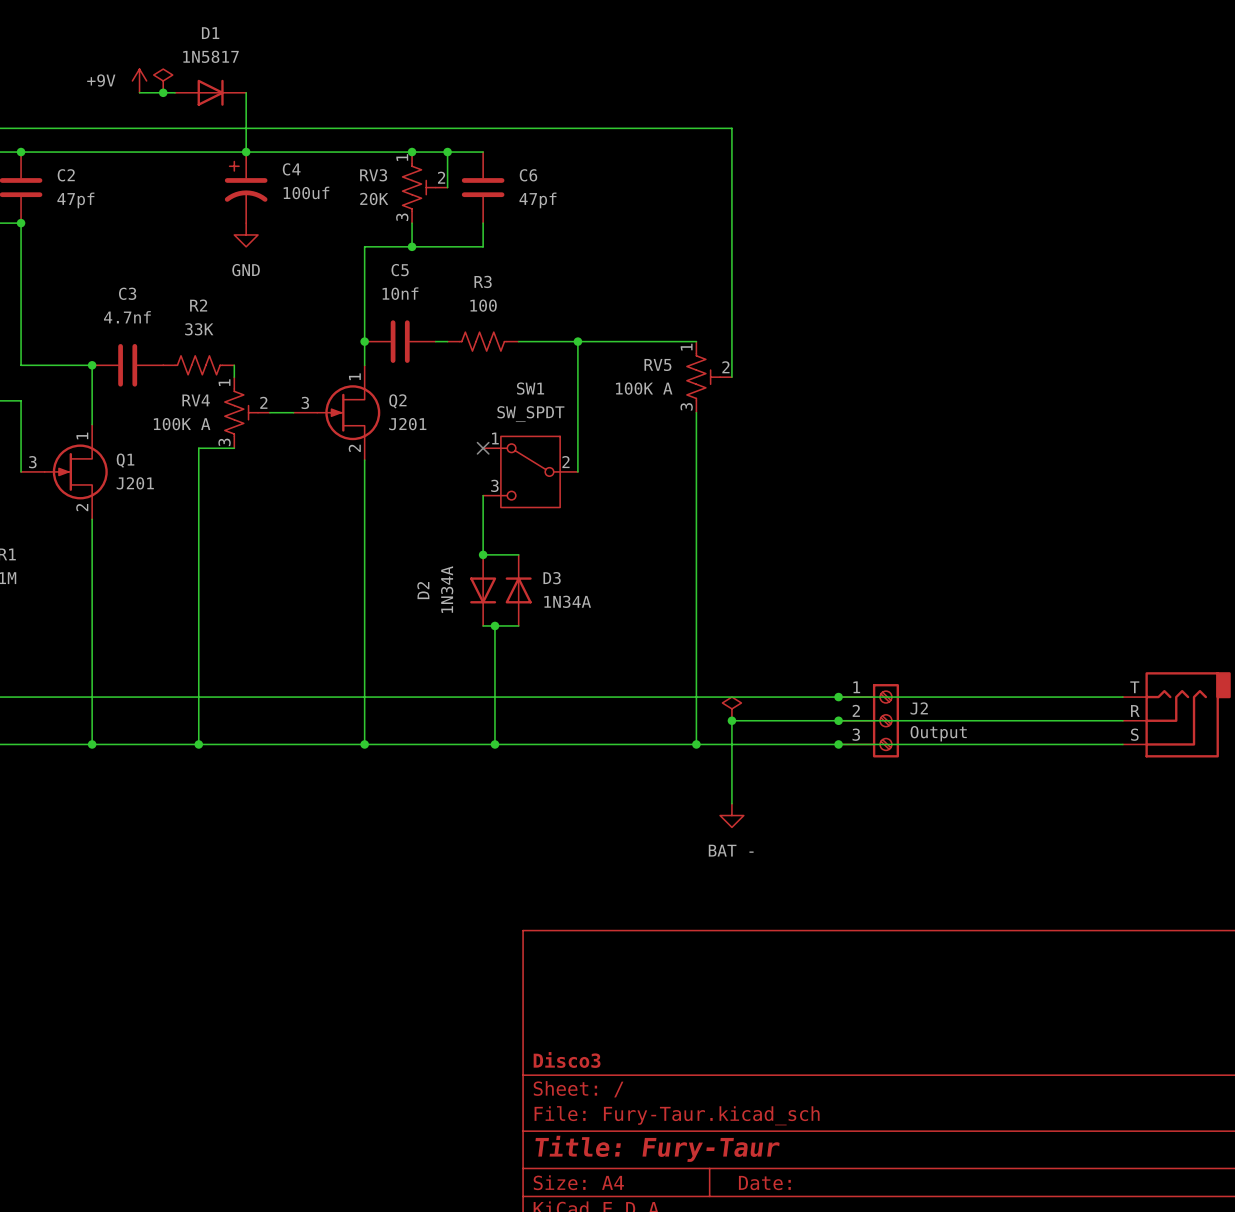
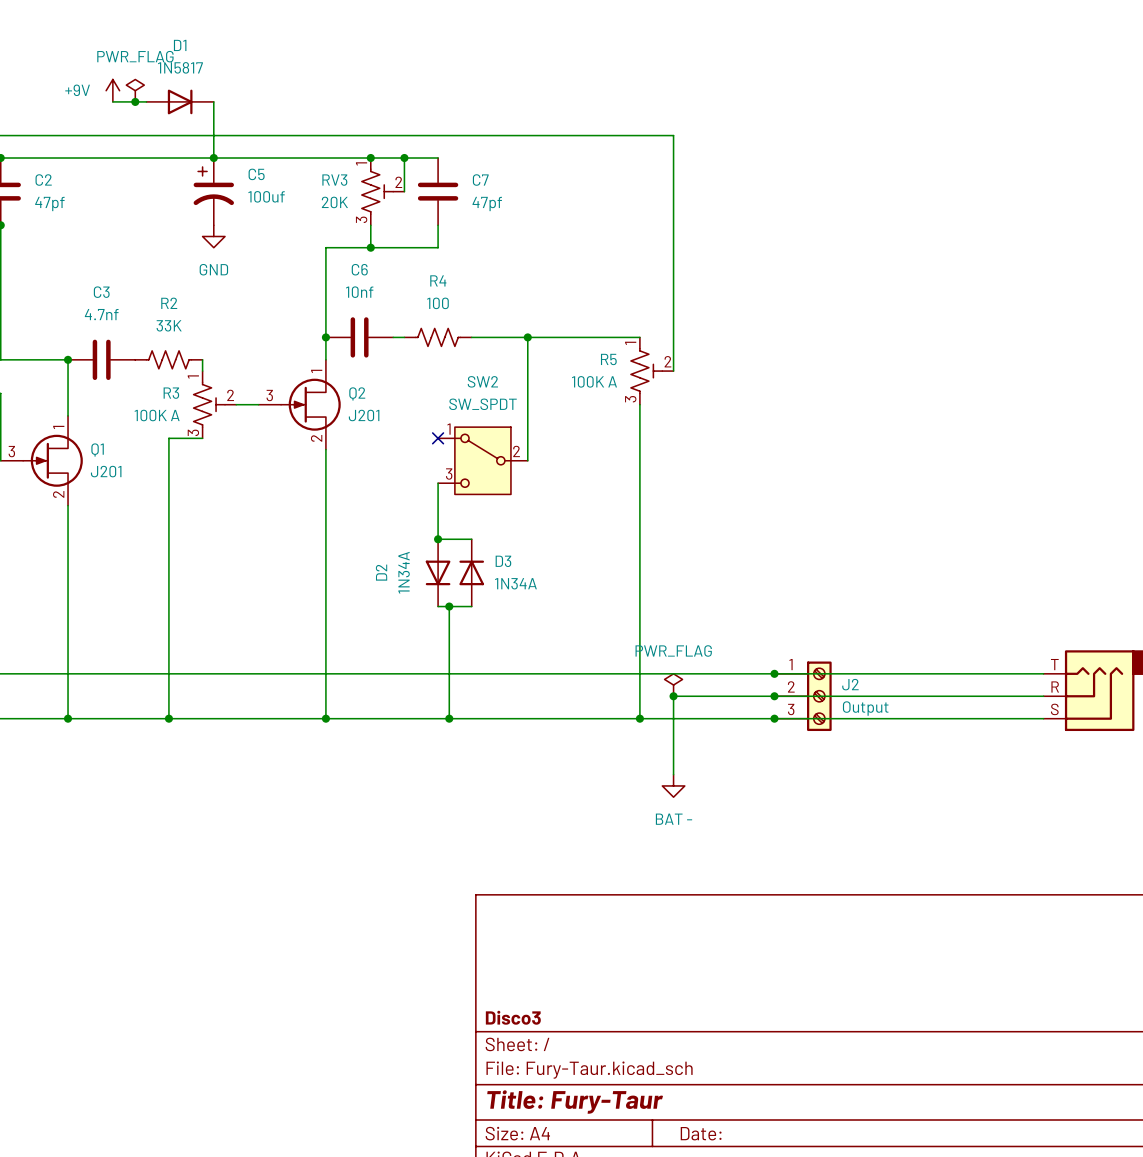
power symbol text: none -> PWR_FLAG (135, 56)
C4 name: C4 (291, 169) -> C5 (256, 174)
C6 name: C6 (528, 175) -> C7 (480, 180)
C5 name: C5 (400, 270) -> C6 (359, 269)
R3 name: R3 (483, 281) -> R4 (438, 280)
RV5 name: RV5 (657, 364) -> R5 (608, 359)
SW1 name: SW1 (530, 388) -> SW2 (482, 381)
RV4 name: RV4 (196, 400) -> R3 (171, 393)
power symbol text: none -> PWR_FLAG (673, 650)

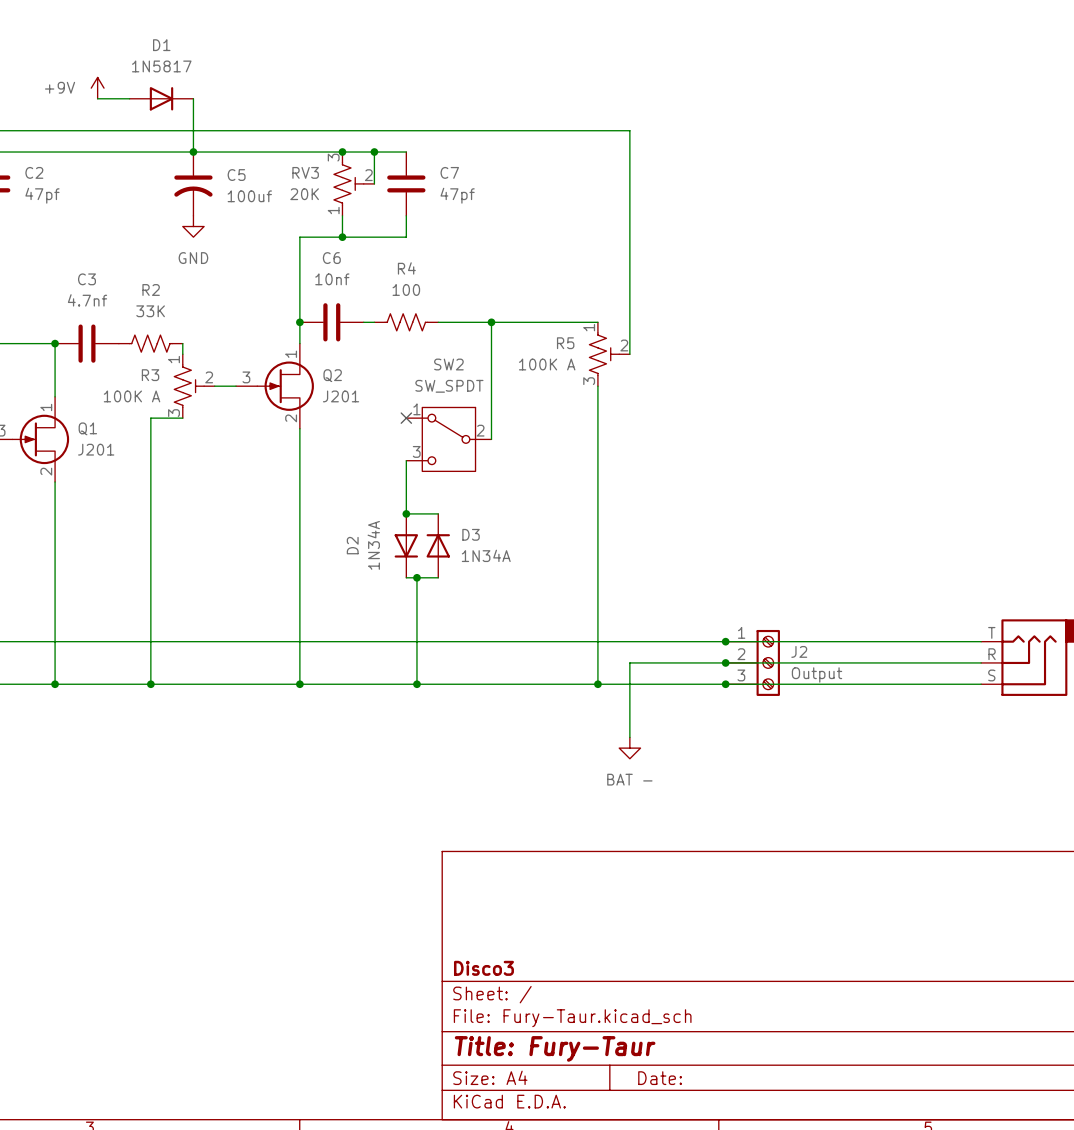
power symbol: PWR_FLAG (135, 90) -> none
junction: (135, 101) -> none
C5 symbol: [193, 158, 234, 226] -> [174, 152, 213, 216]
RV3 pin number: 1 (361, 163) -> 3 (333, 157)
RV3 pin number: 3 (361, 219) -> 1 (333, 210)
power symbol: PWR_FLAG (673, 685) -> none
junction: (673, 696) -> none

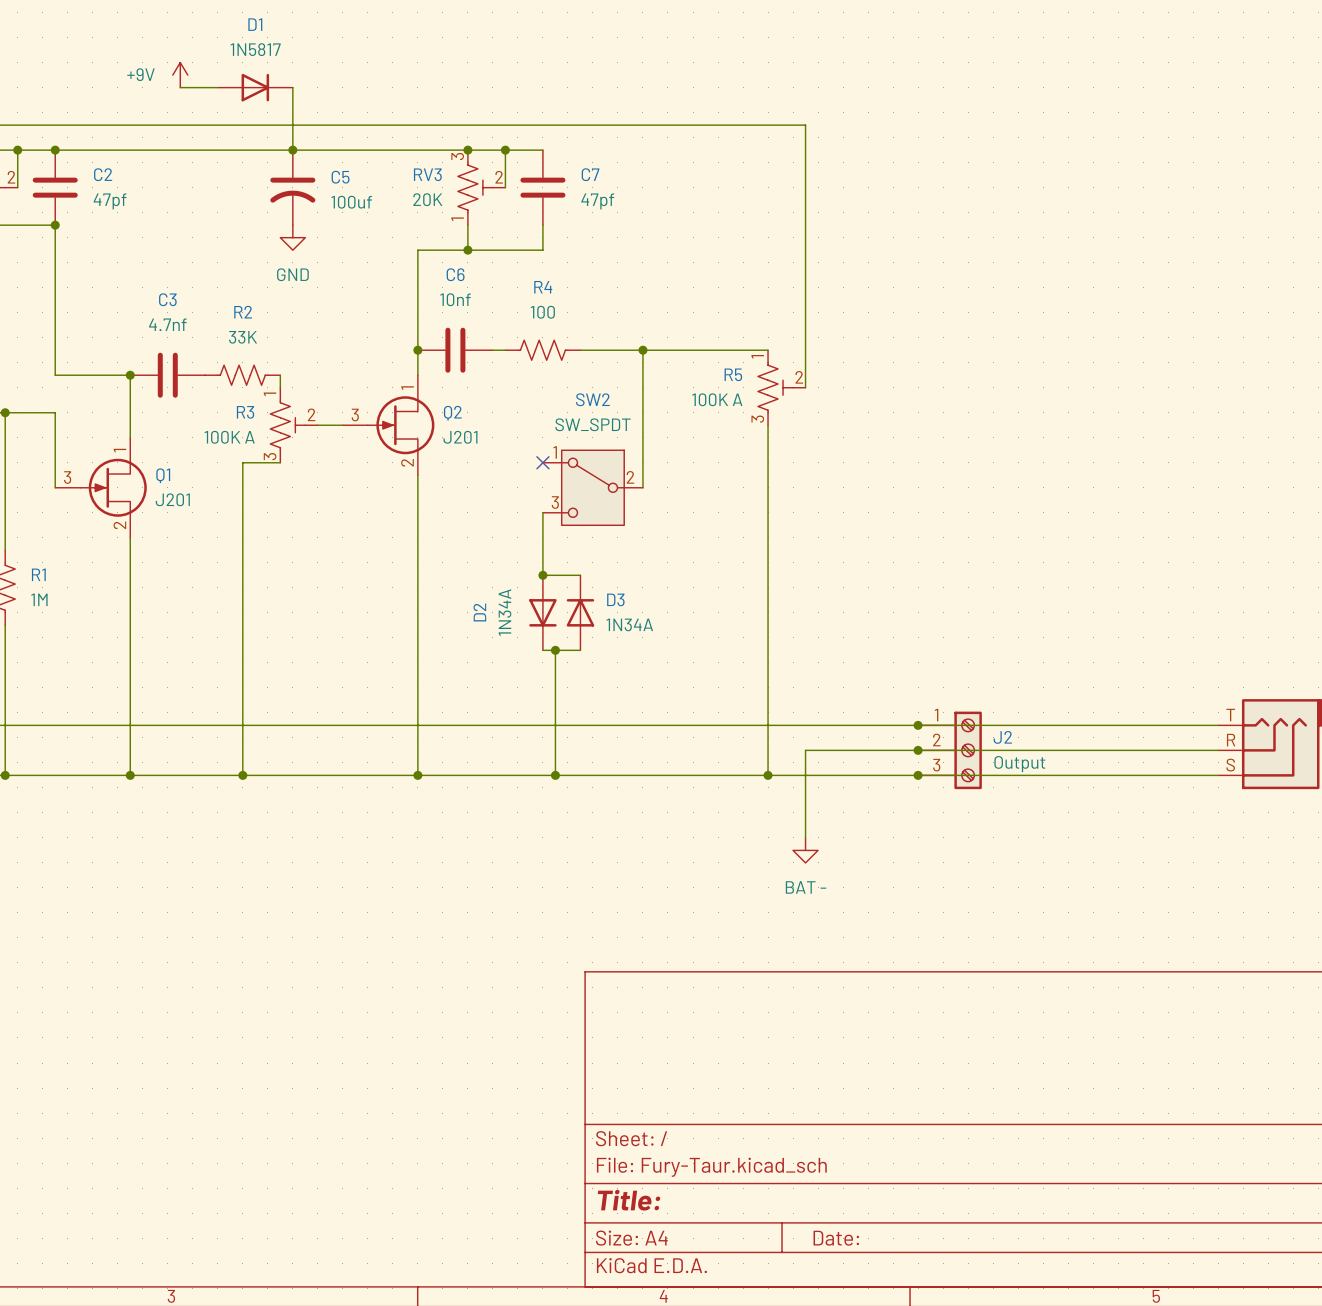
title block: Disco3 (483, 968) -> none
title block: Title: Fury-Taur (555, 1048) -> Title: (629, 1200)

